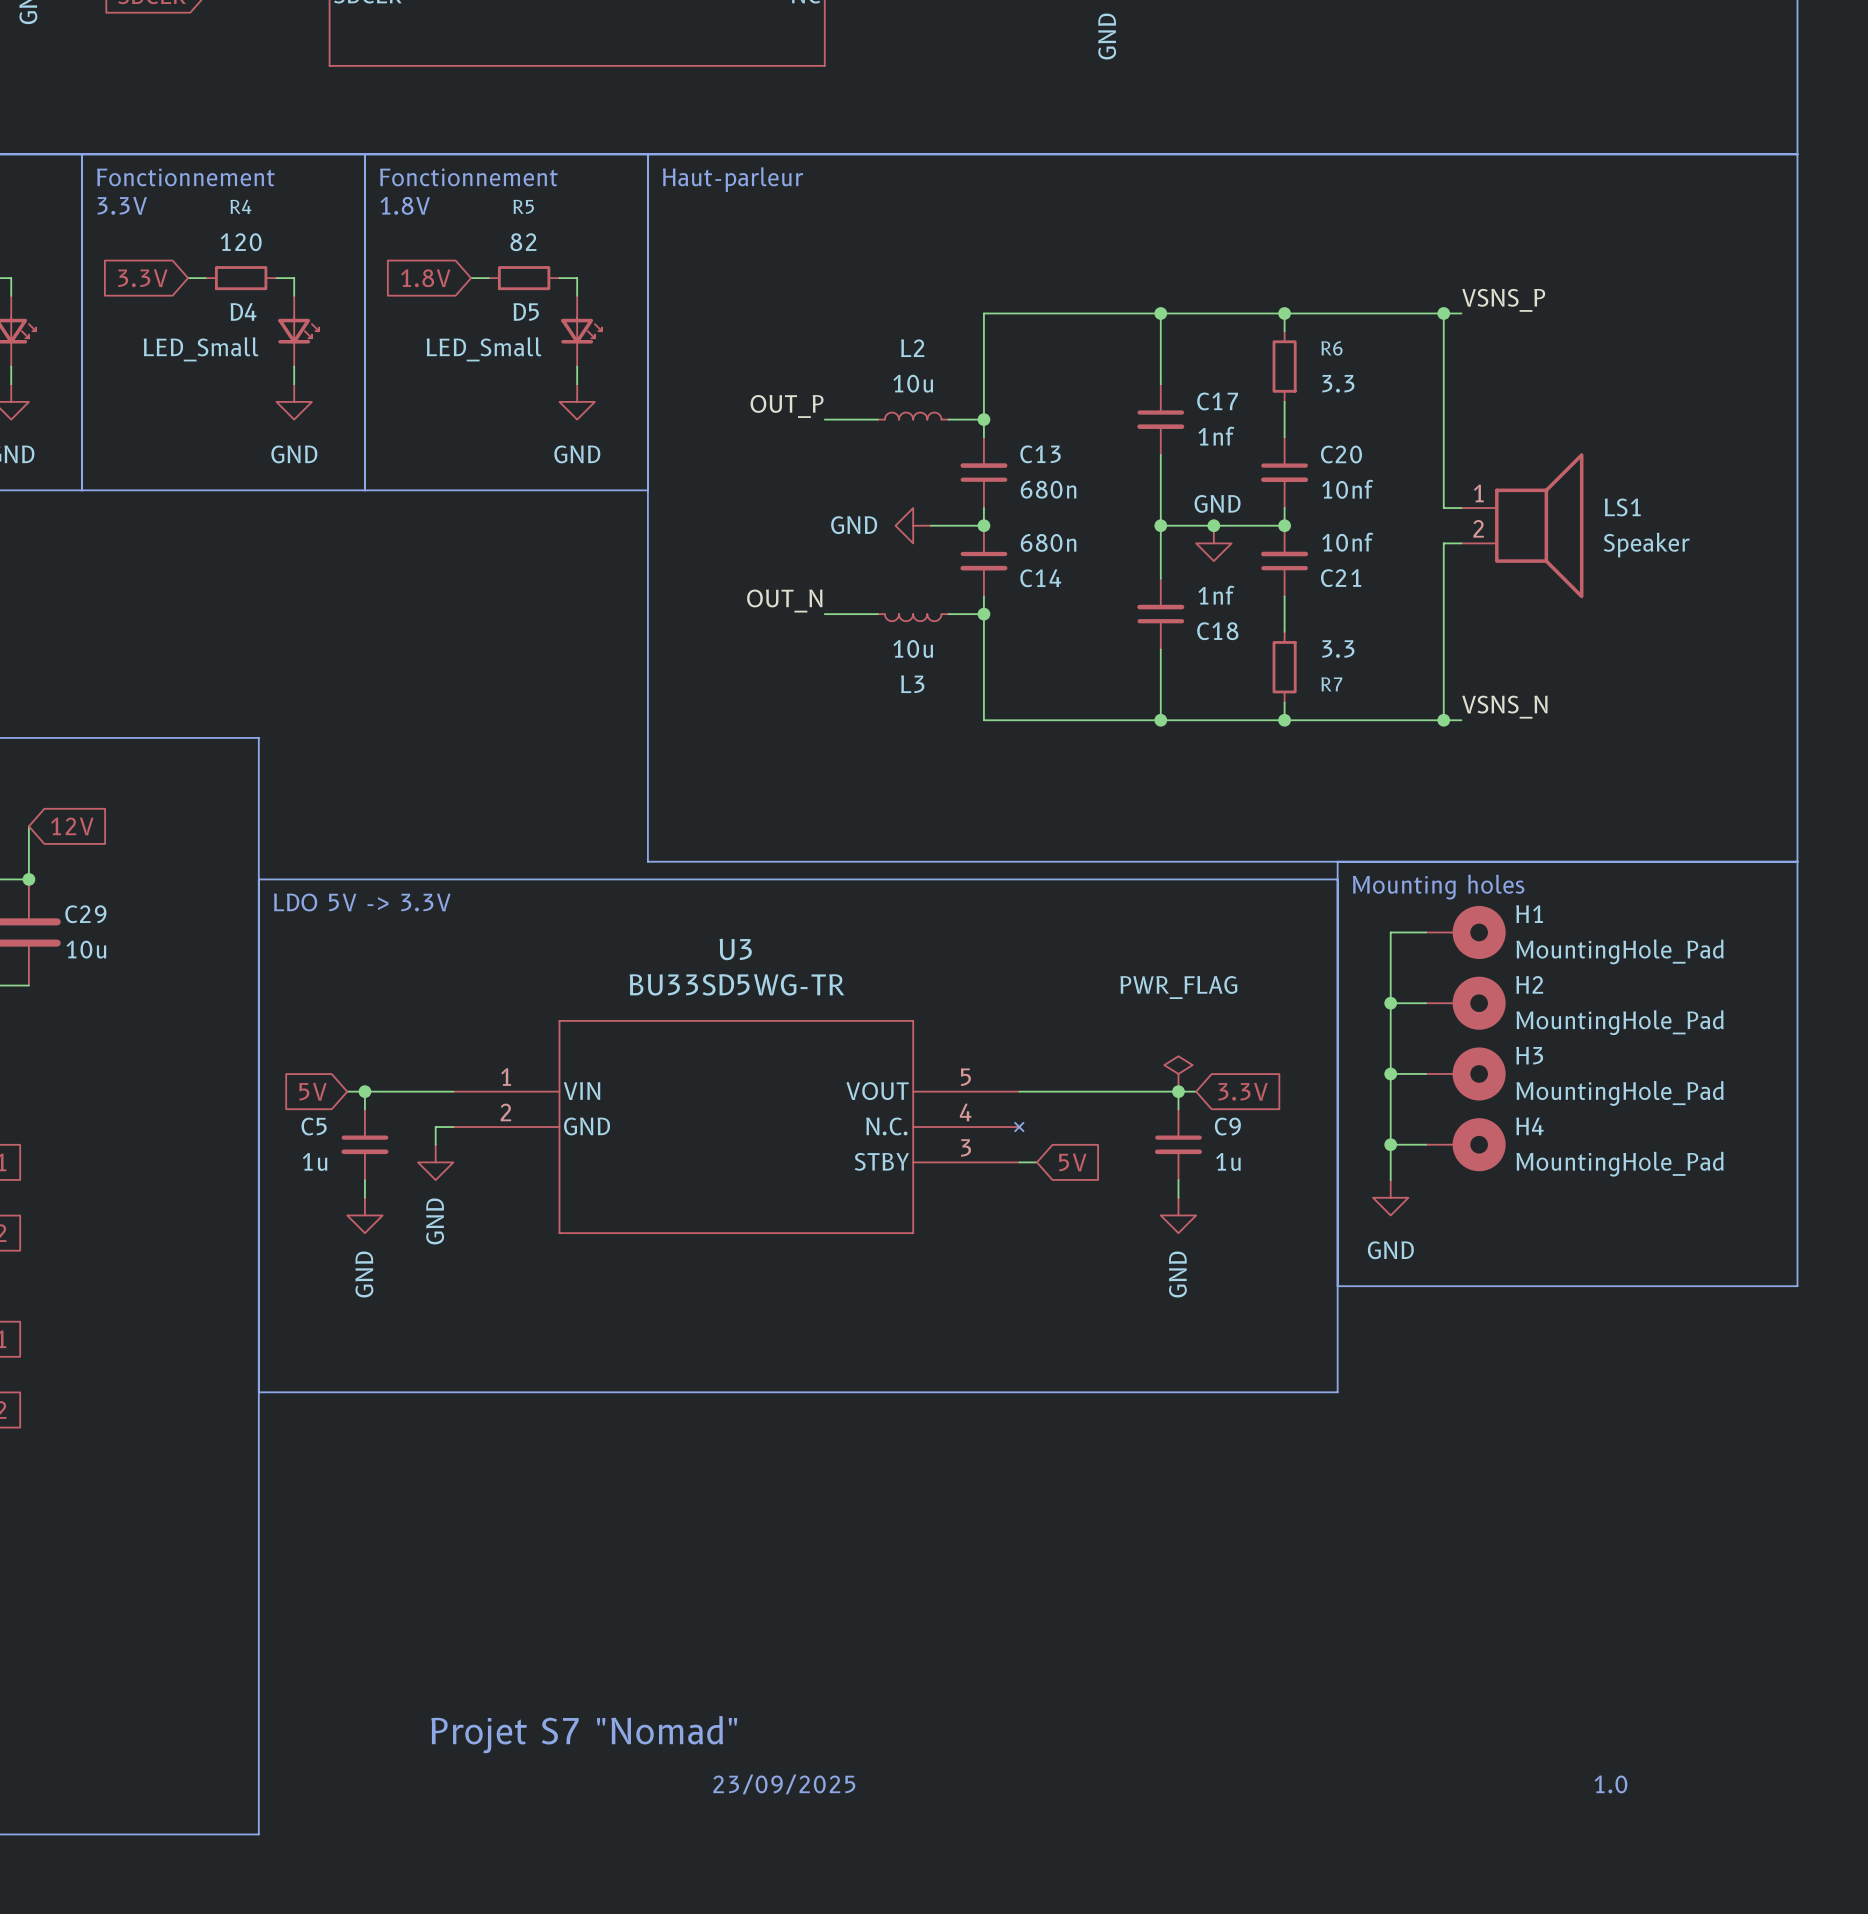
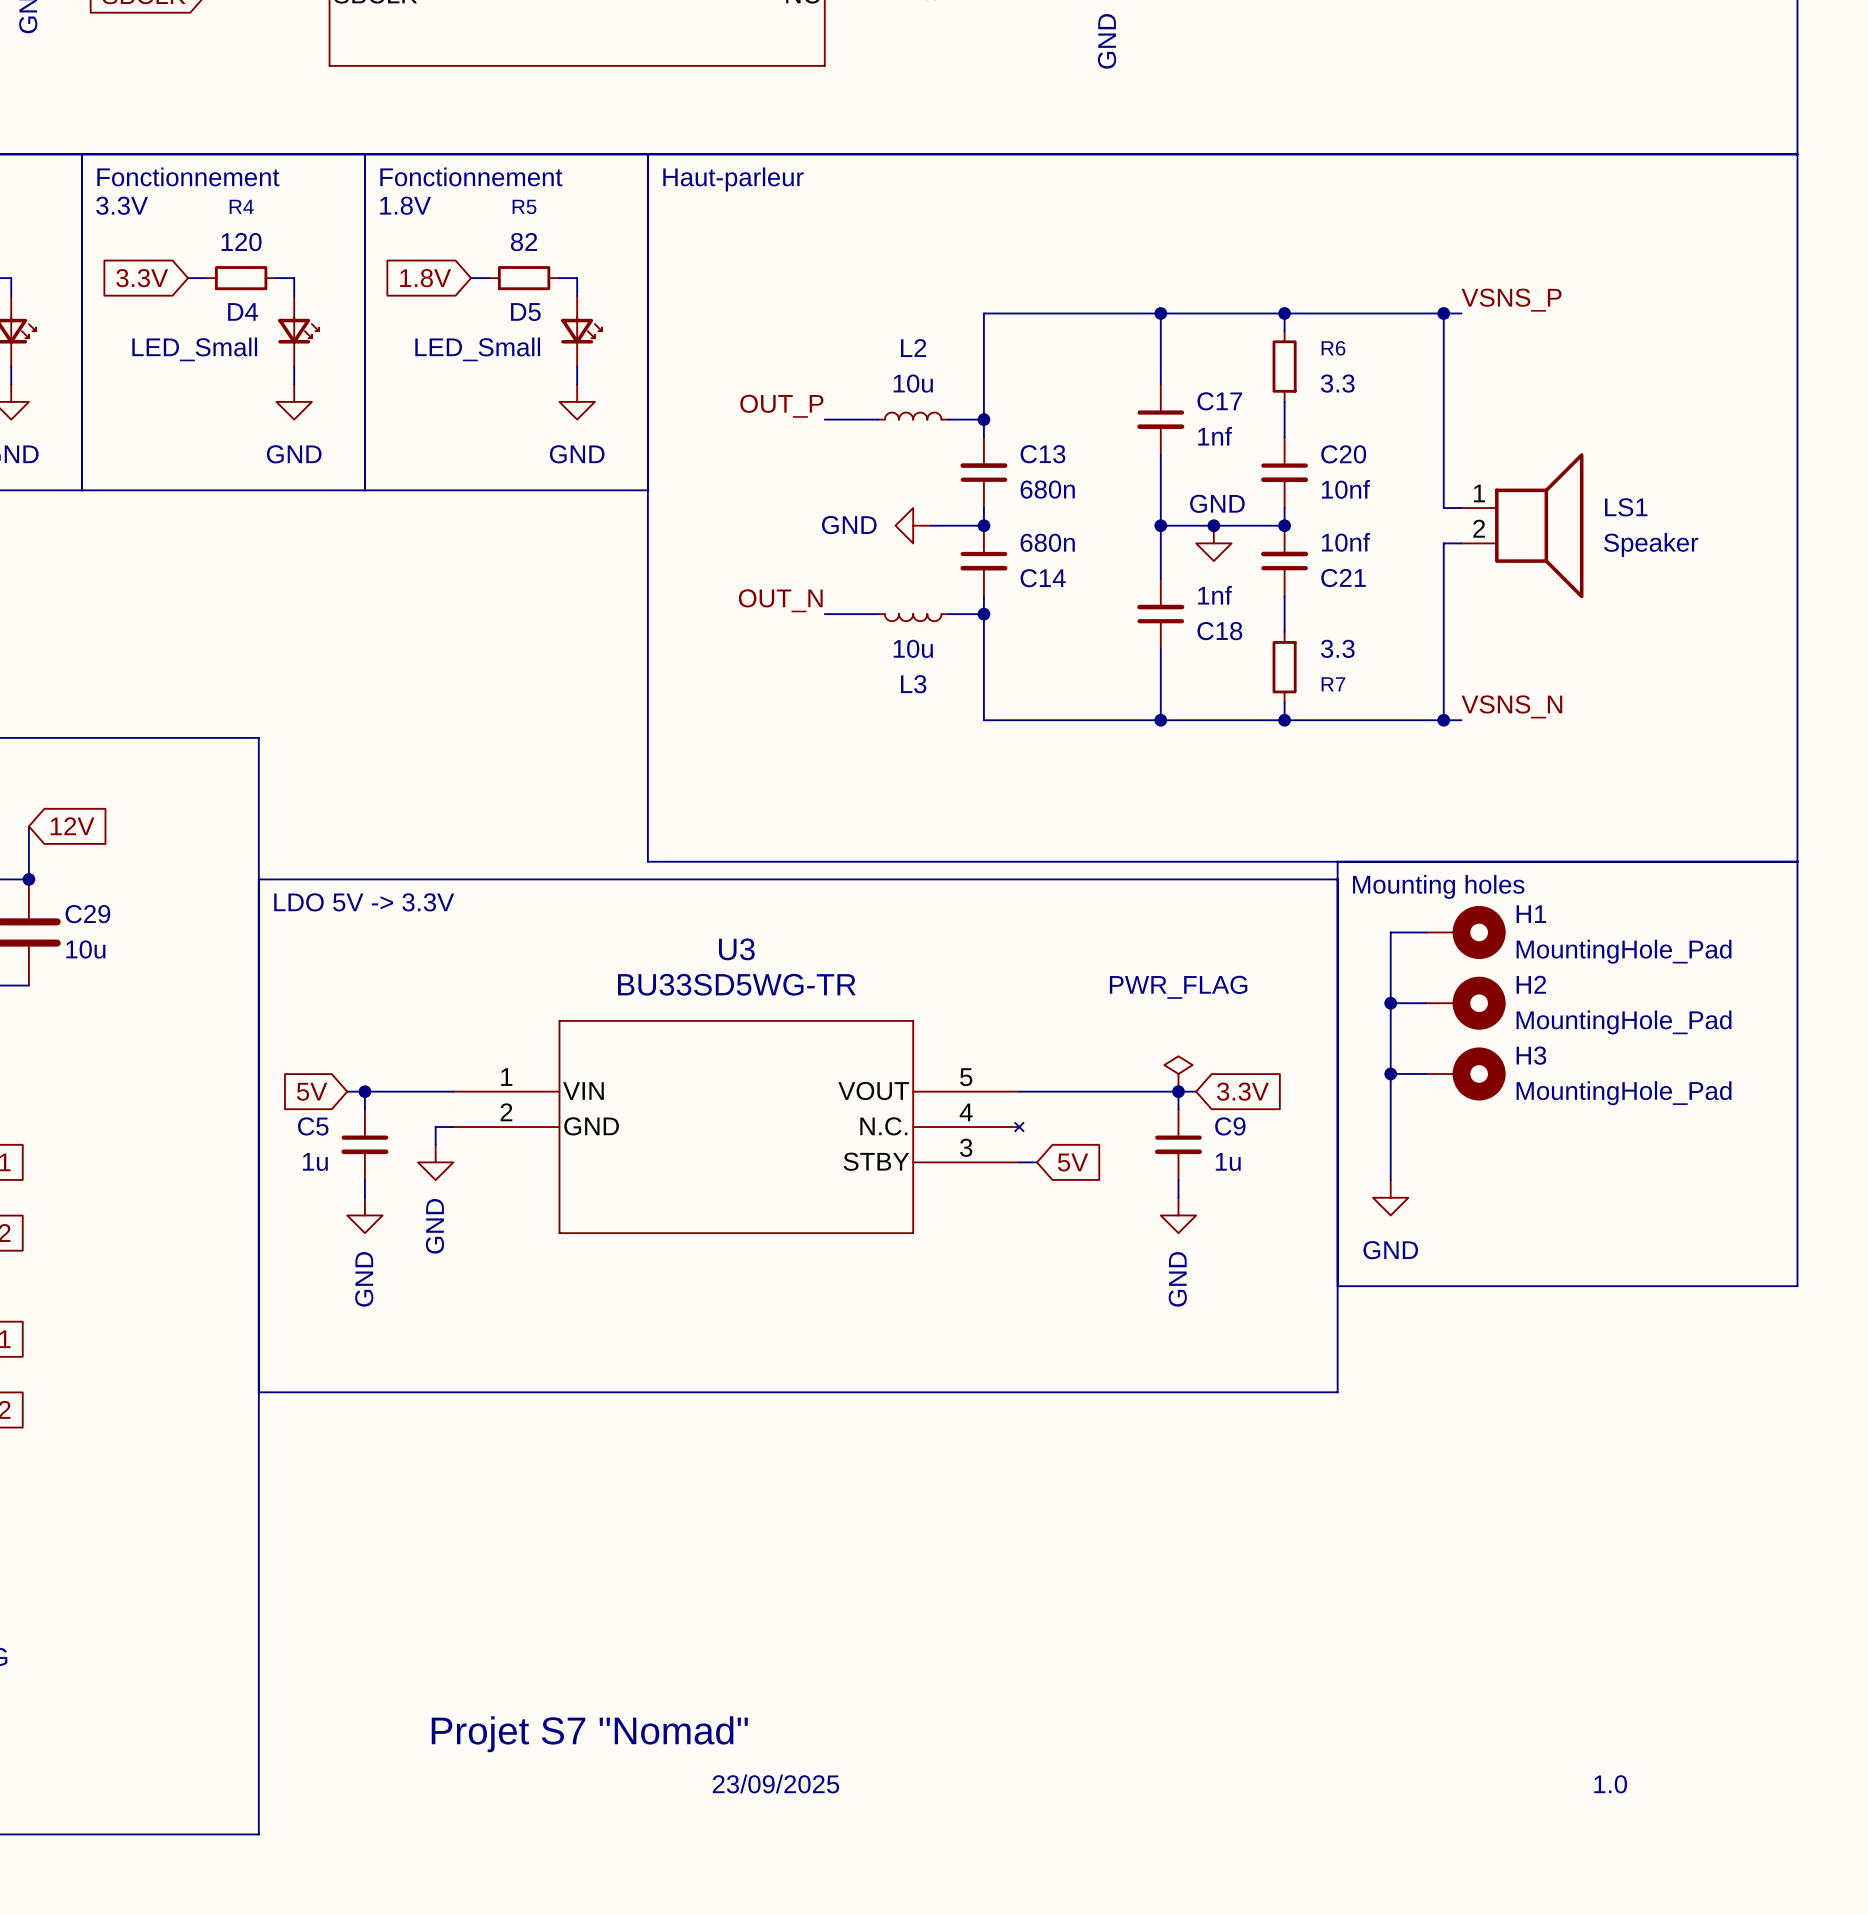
wire: (1390, 1144) (1426, 1144) -> none
junction: (1390, 1144) -> none
H4: MountingHole_Pad (1465, 1144) -> none

